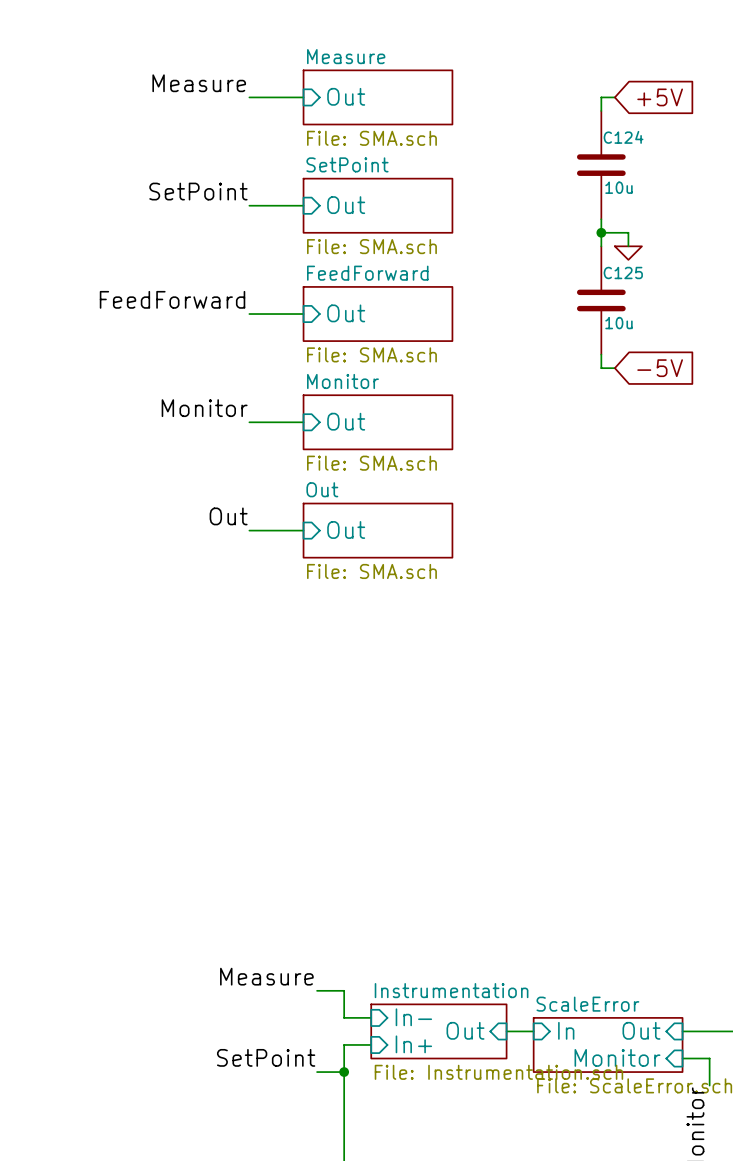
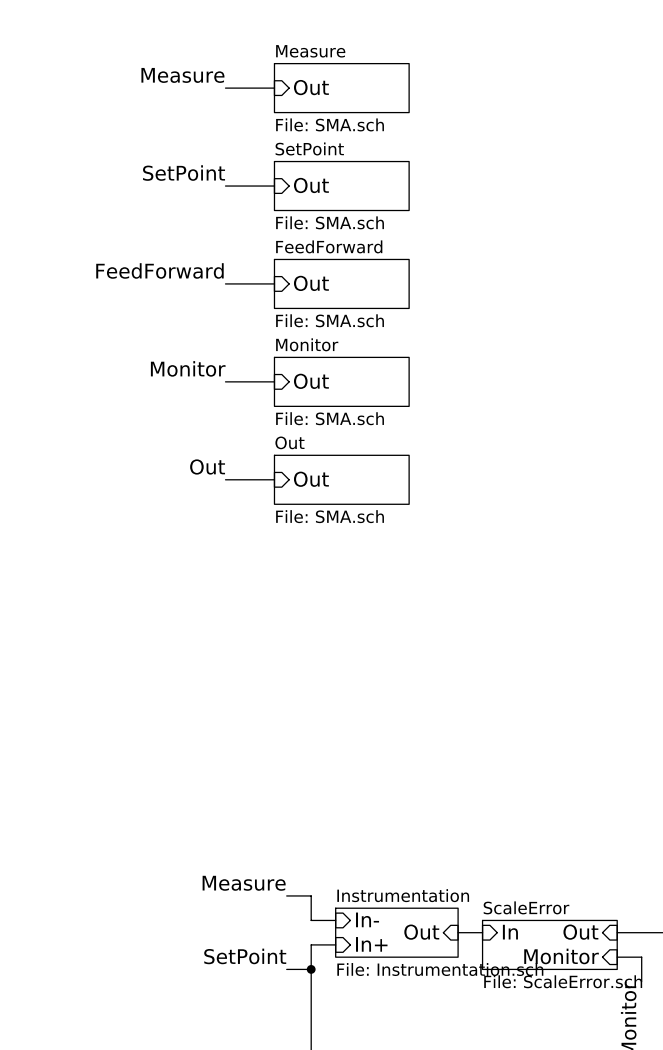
wire: (614, 97) (601, 97) (601, 110) -> none
global label: +5V (660, 97) -> none
C124: 10u (601, 165) -> none
wire: (601, 219) (601, 246) -> none
wire: (601, 232) (628, 232) (628, 246) -> none
junction: (601, 232) -> none
power symbol: (628, 253) -> none
C125: 10u (601, 300) -> none
wire: (601, 354) (601, 368) (614, 368) -> none
global label: -5V (660, 368) -> none

